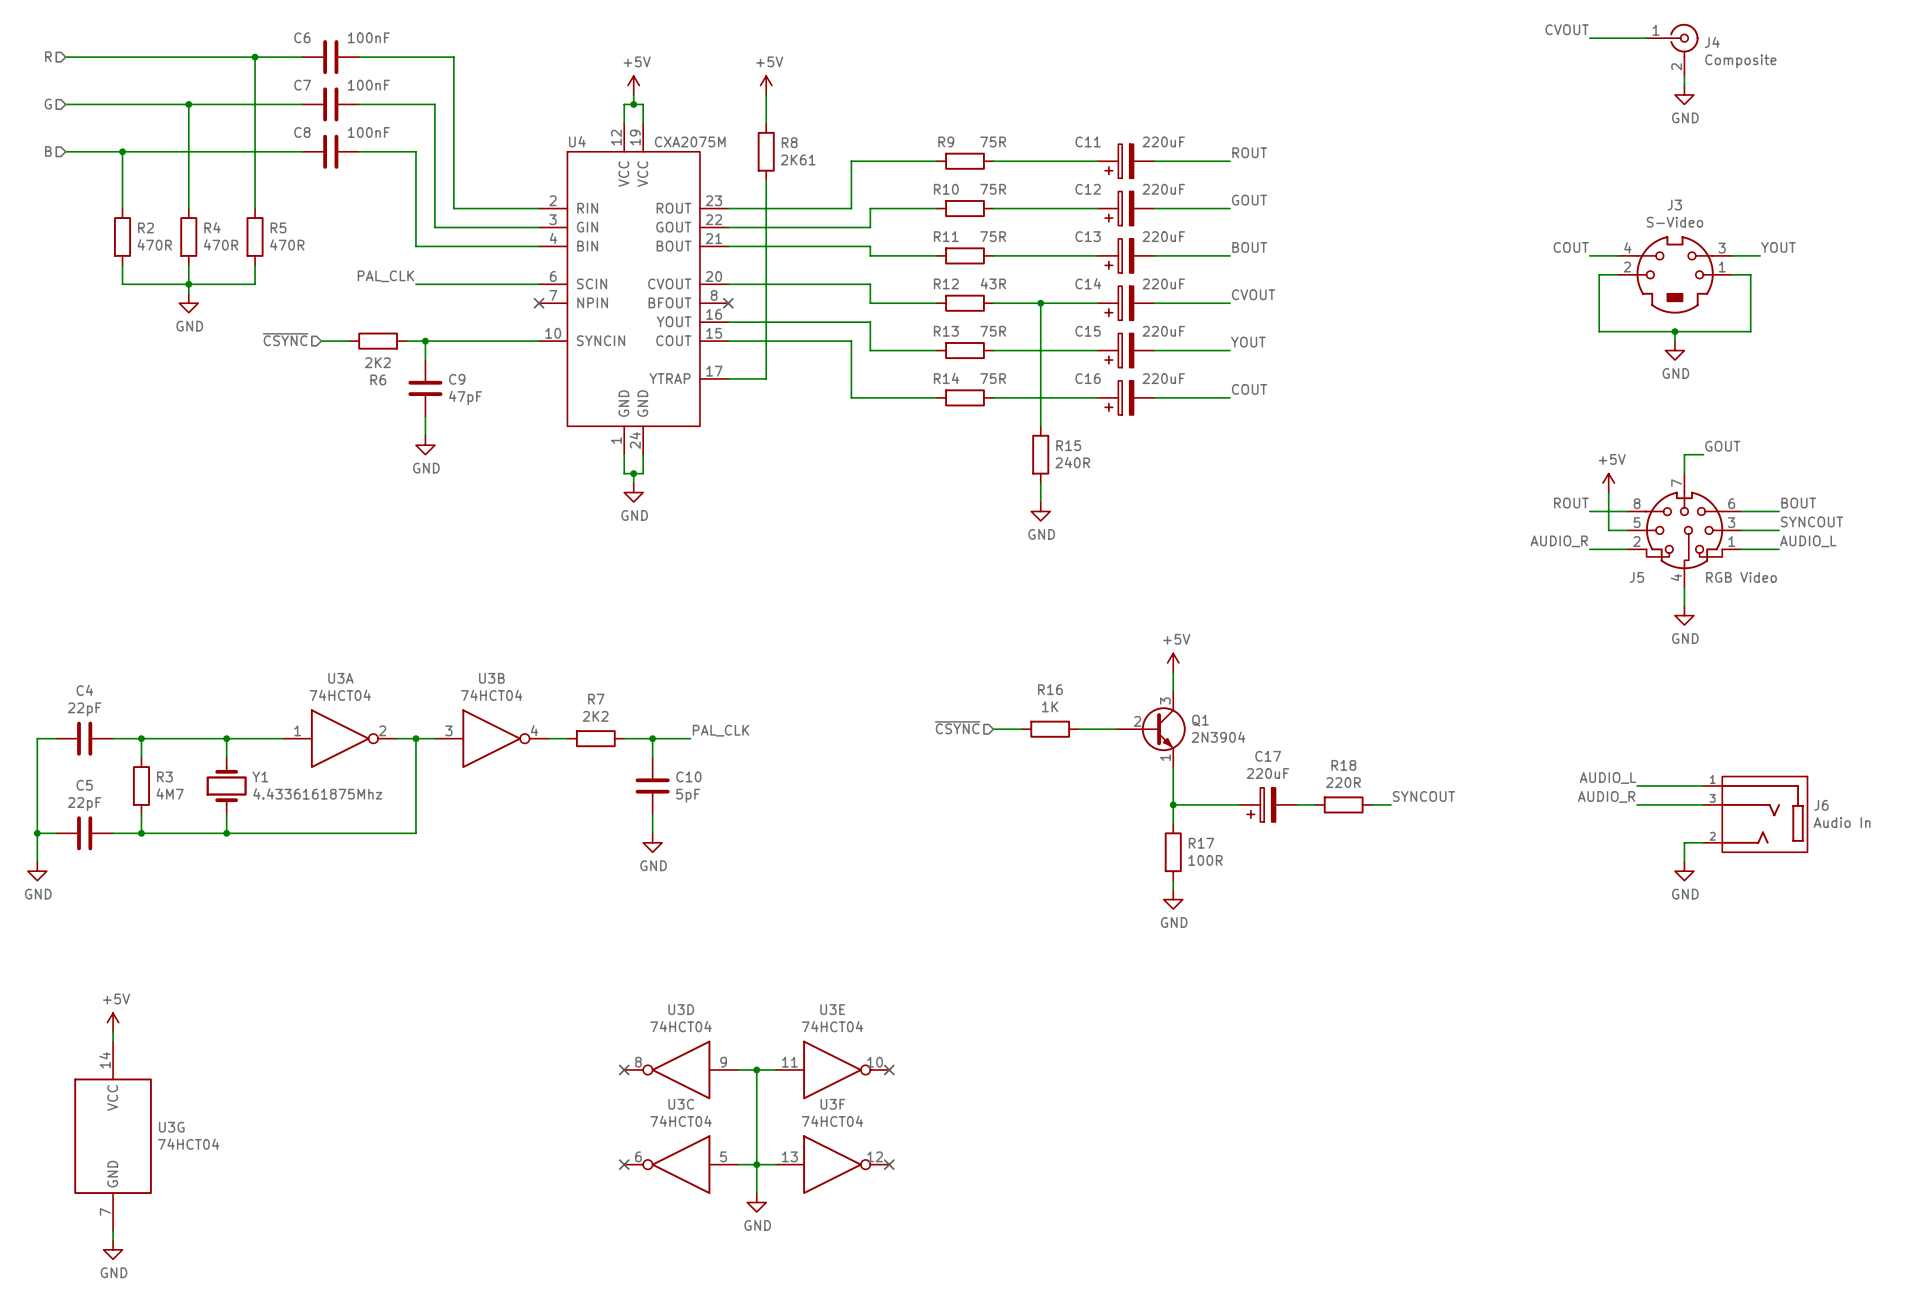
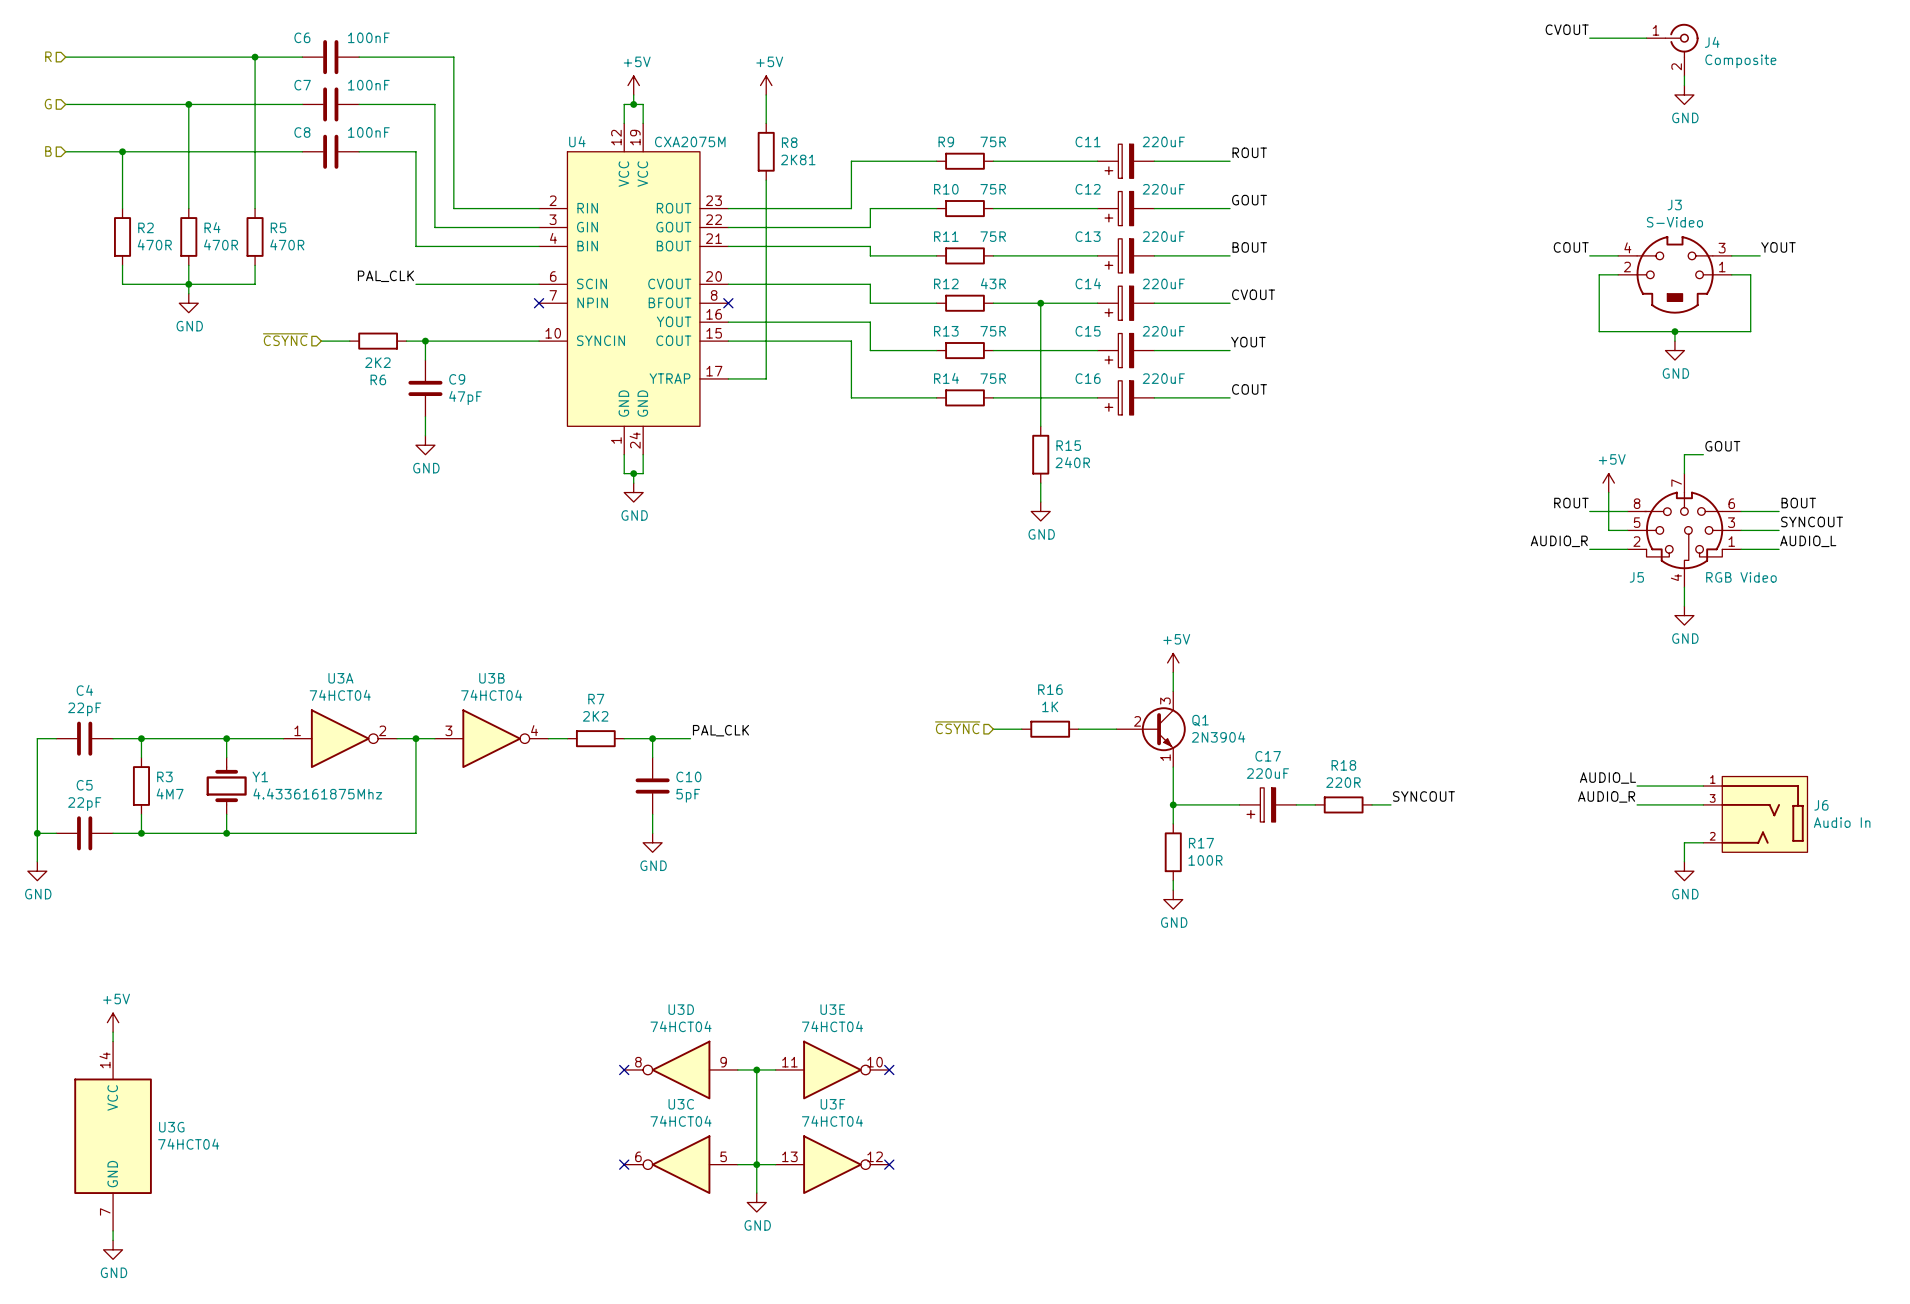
R8 value: 2K61 (798, 159) -> 2K81 (798, 159)

